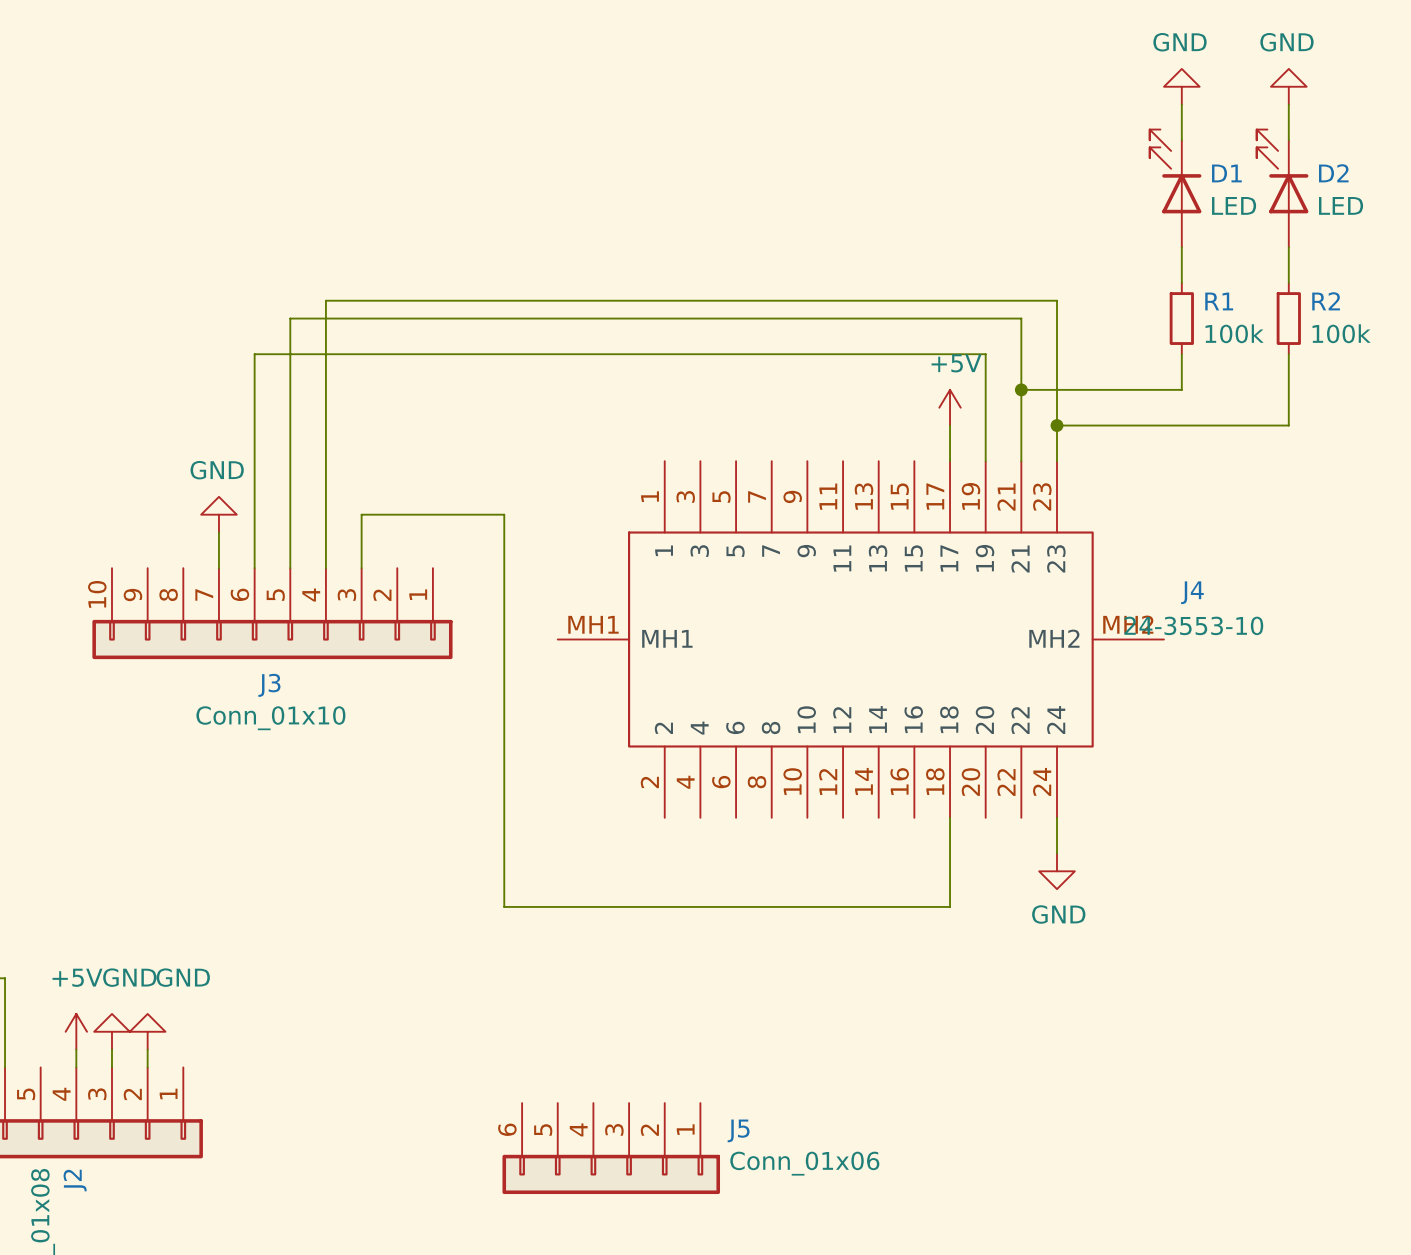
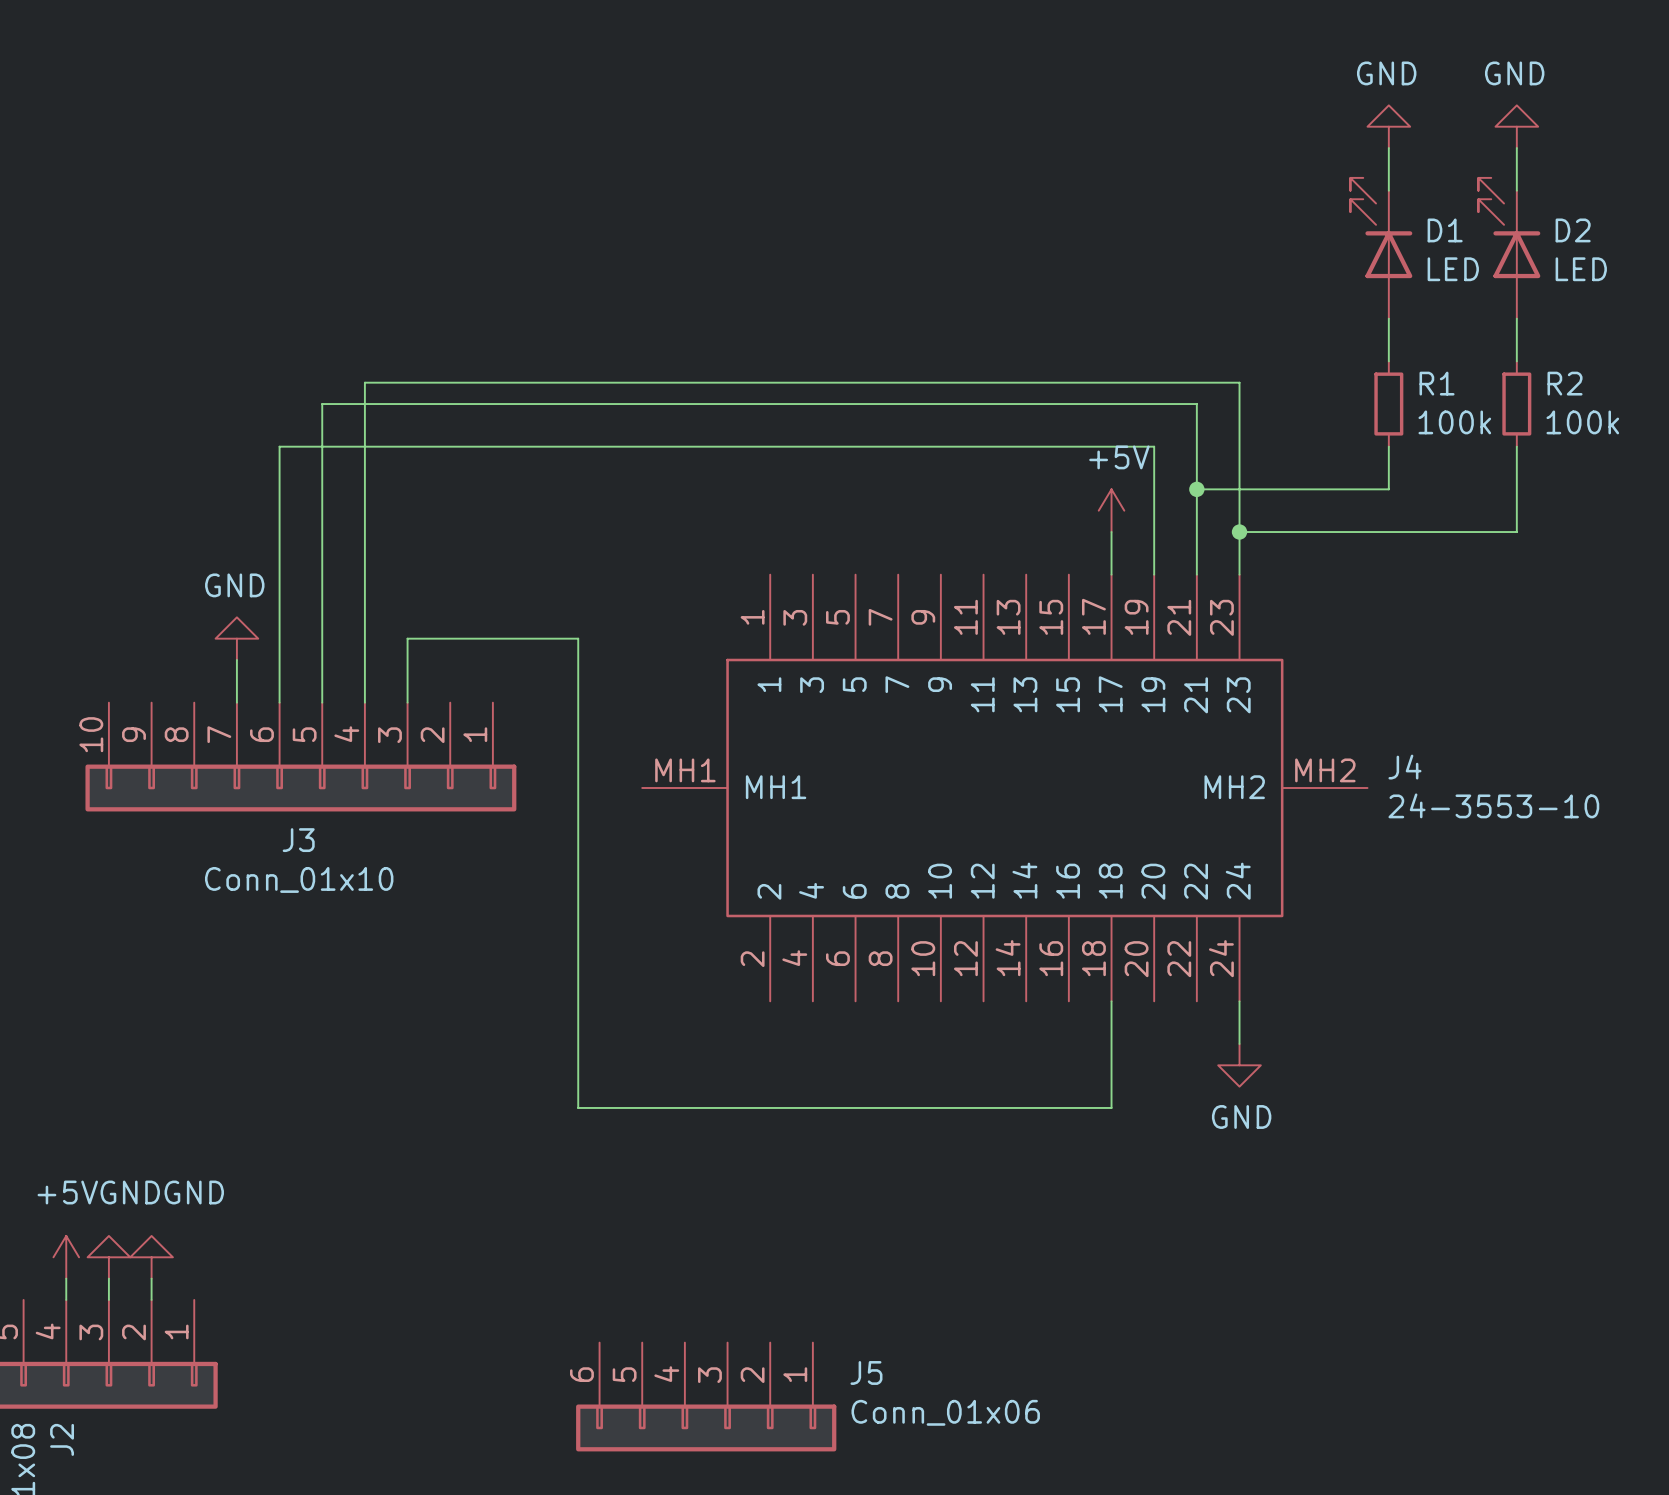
J4 name position: J4 (1192, 592) -> J4 (1404, 767)
J4 value position: 24-3553-10 (1193, 625) -> 24-3553-10 (1493, 805)

